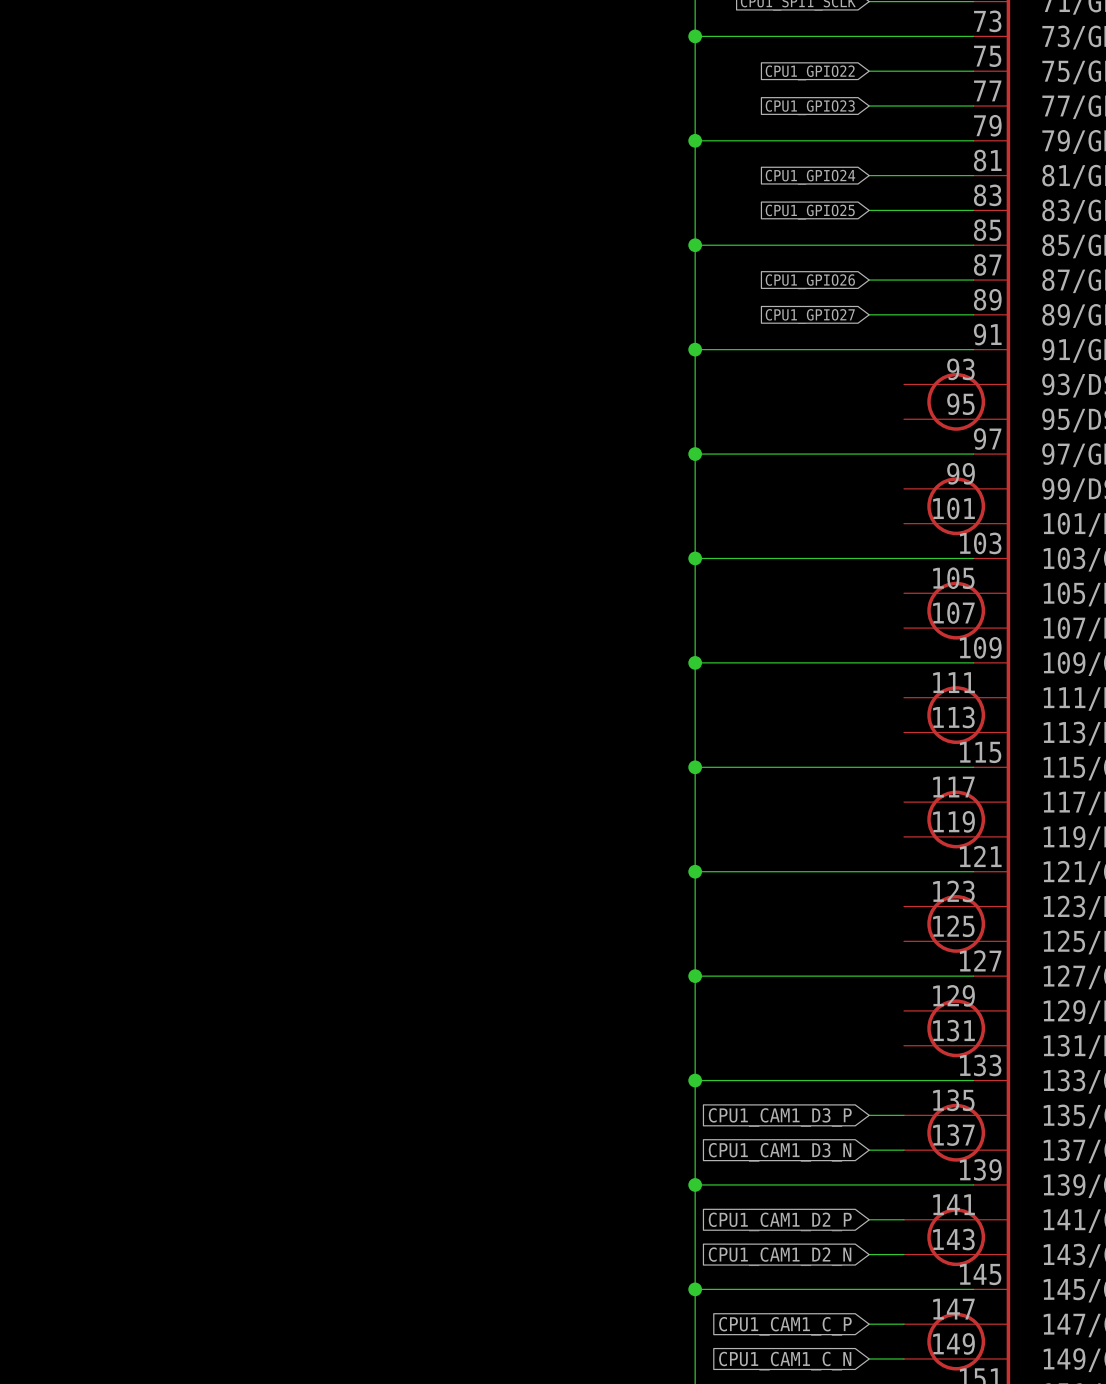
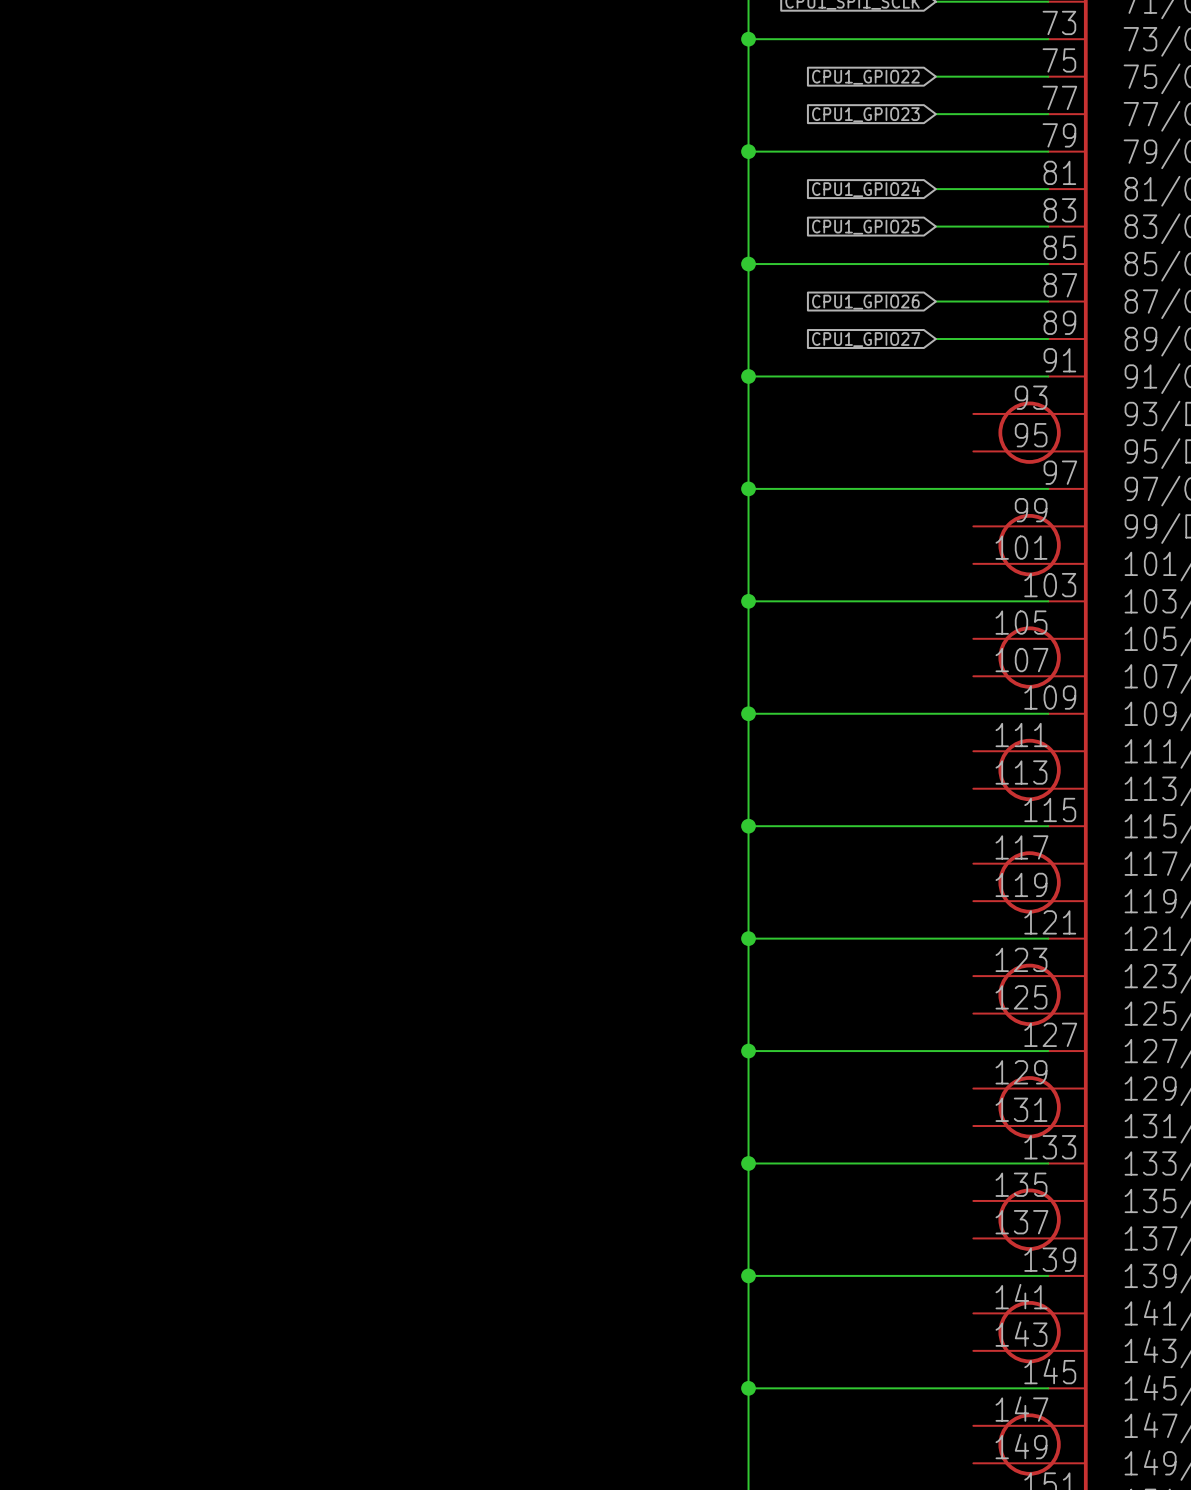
wire: (869, 1115) (903, 1115) -> none
global label: CPU1_CAM1_D3_P (780, 1117) -> none
wire: (869, 1150) (903, 1150) -> none
global label: CPU1_CAM1_D3_N (780, 1152) -> none
wire: (869, 1219) (903, 1219) -> none
global label: CPU1_CAM1_D2_P (780, 1221) -> none
wire: (869, 1254) (903, 1254) -> none
global label: CPU1_CAM1_D2_N (780, 1256) -> none
wire: (869, 1324) (903, 1324) -> none
global label: CPU1_CAM1_C_P (785, 1326) -> none
wire: (869, 1358) (903, 1358) -> none
global label: CPU1_CAM1_C_N (785, 1361) -> none

